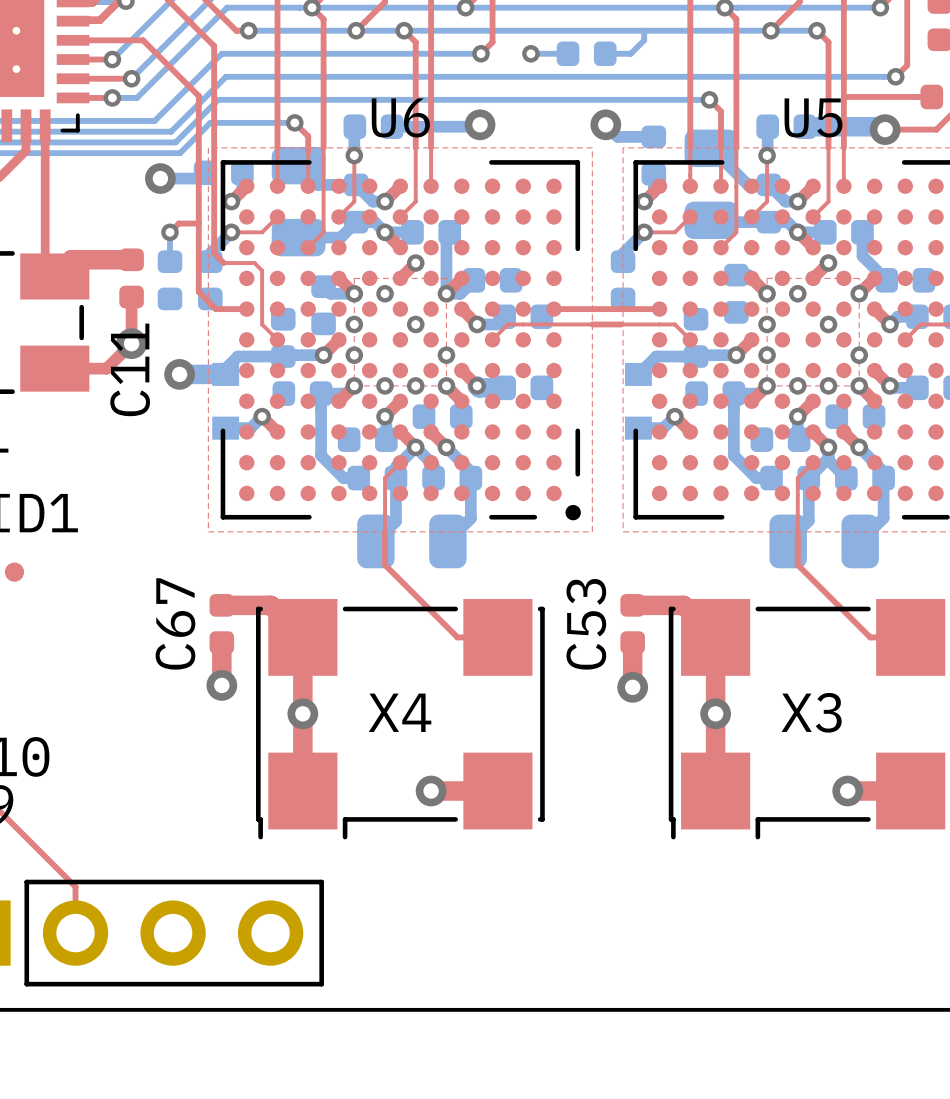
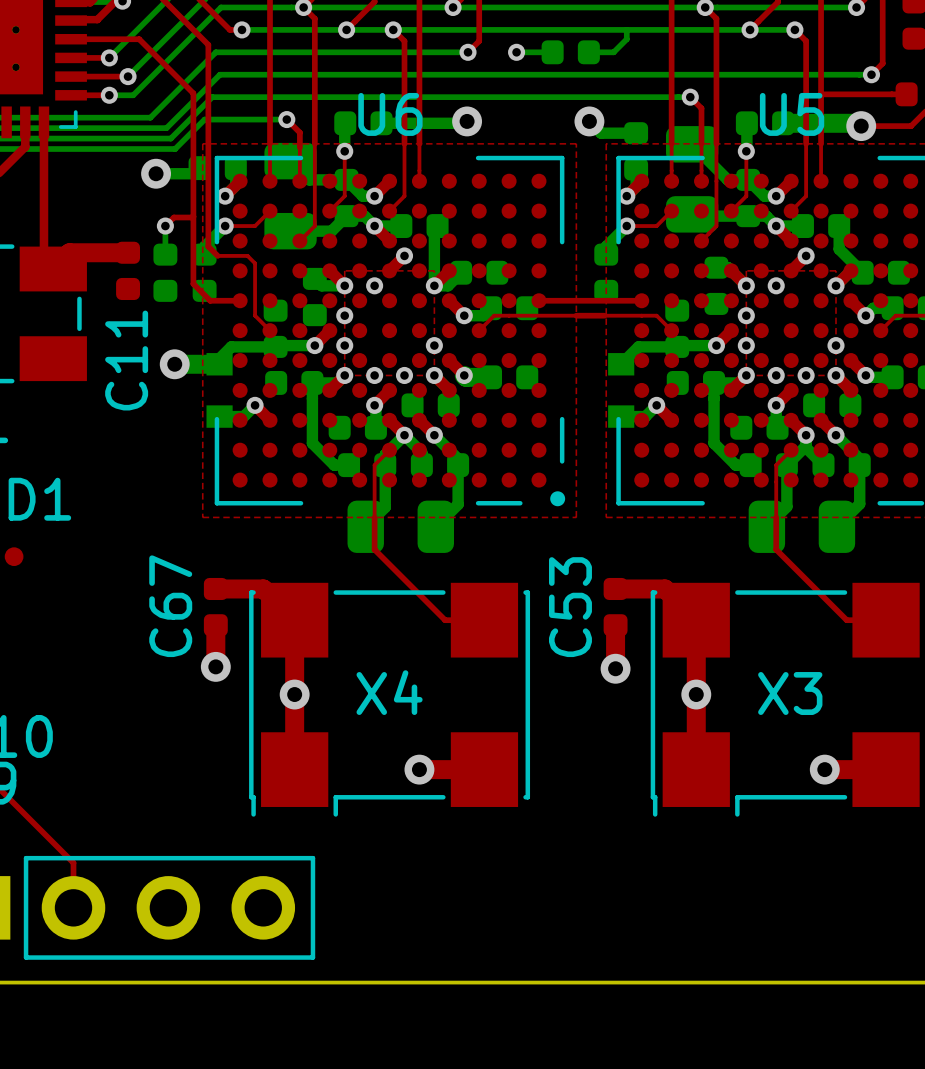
top track: (131, 297) (131, 343) (106, 368) (54, 368) -> none
via: (415, 324) -> none
via: (828, 324) -> none
via: (131, 343) -> none

